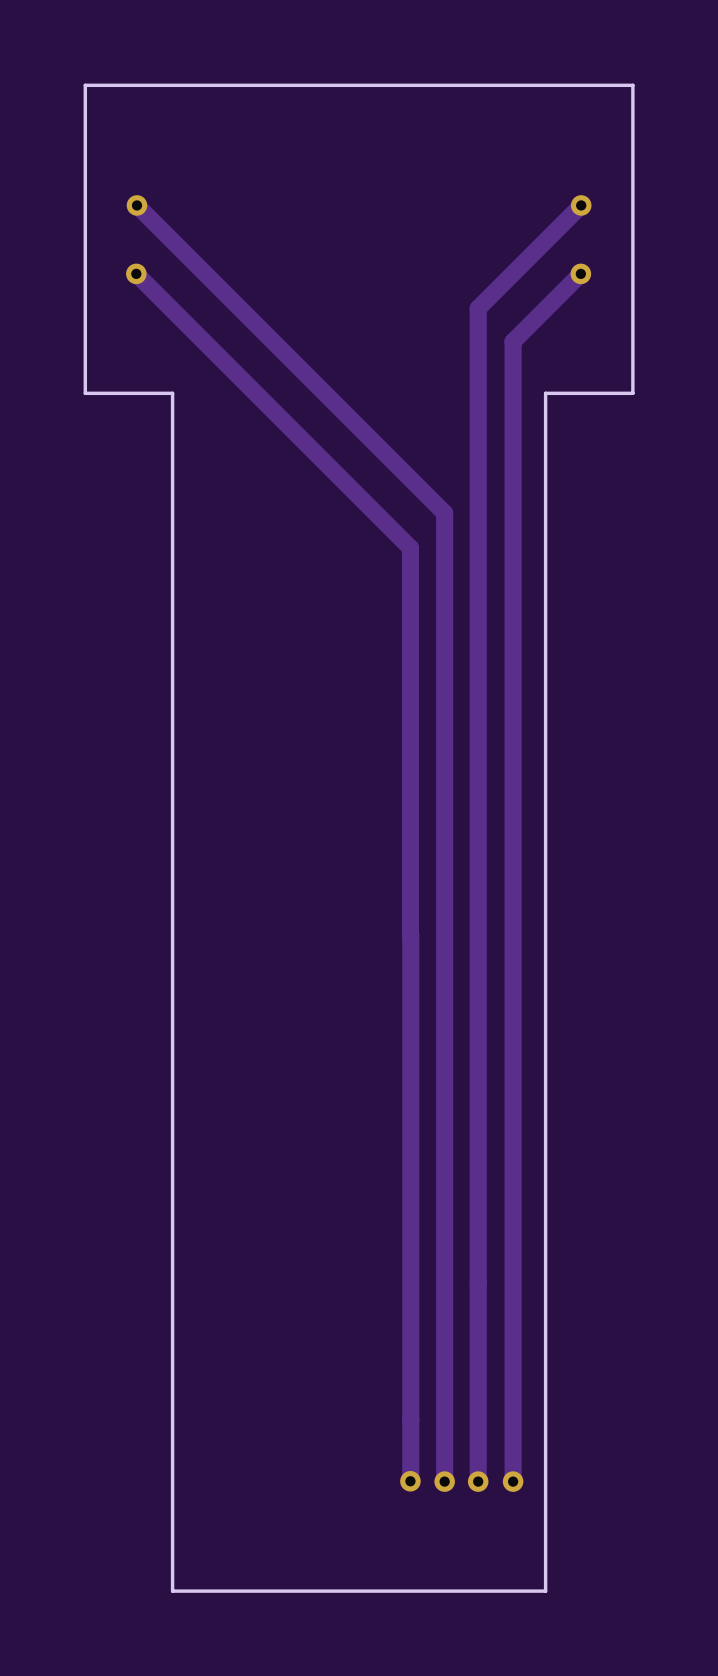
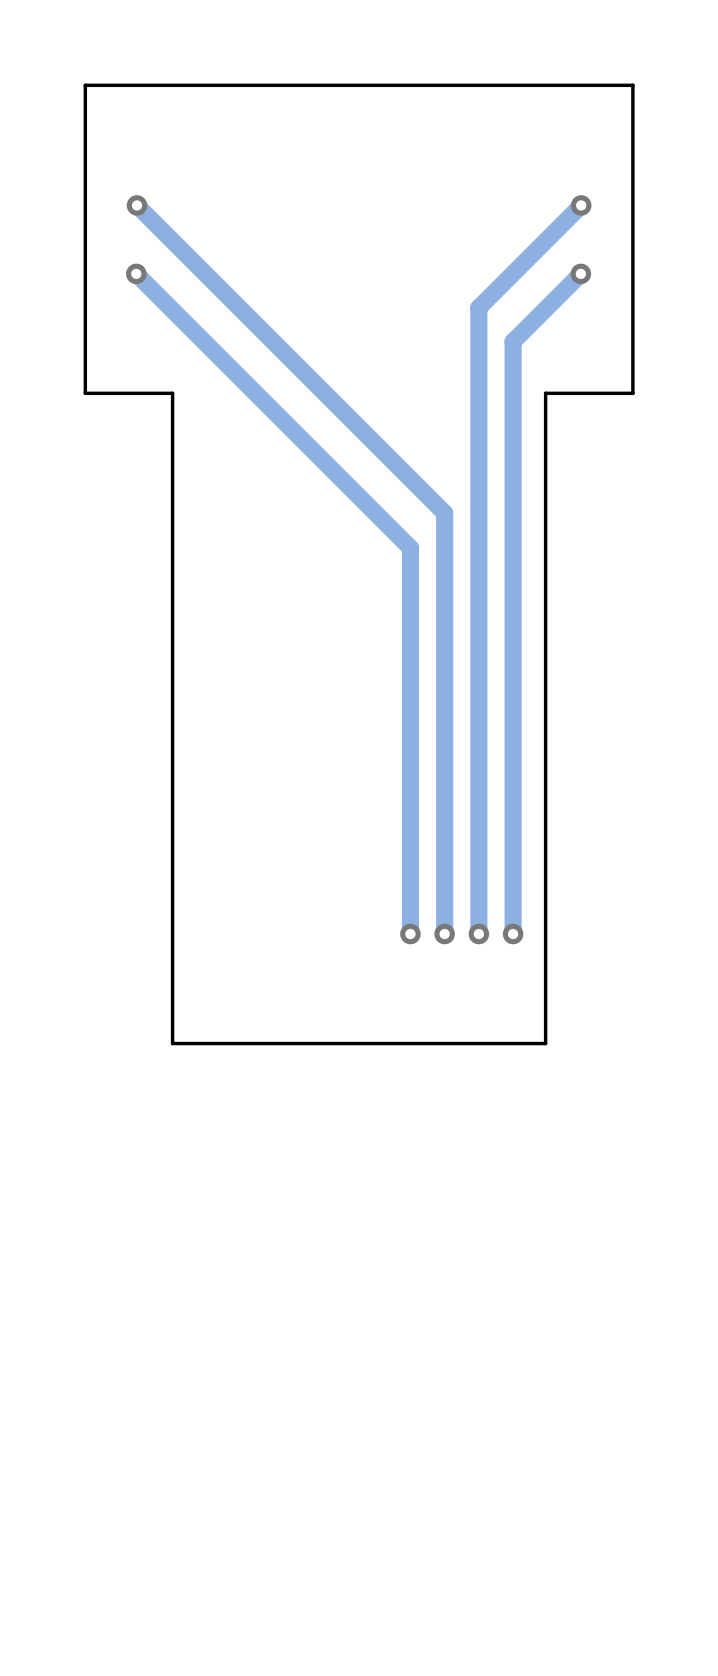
track: (478, 307) (478, 1481) -> (478, 307) (478, 934)
part: none -> (359, 564)
part: (359, 838) -> none
track: (410, 934) (410, 1480) -> none
via: none -> (410, 934)
track: (444, 934) (444, 1481) -> none
via: none -> (444, 934)
via: none -> (478, 934)
track: (513, 934) (513, 1481) -> none
via: none -> (513, 934)
via: (410, 1481) -> none
via: (444, 1481) -> none
via: (478, 1481) -> none
via: (513, 1481) -> none

